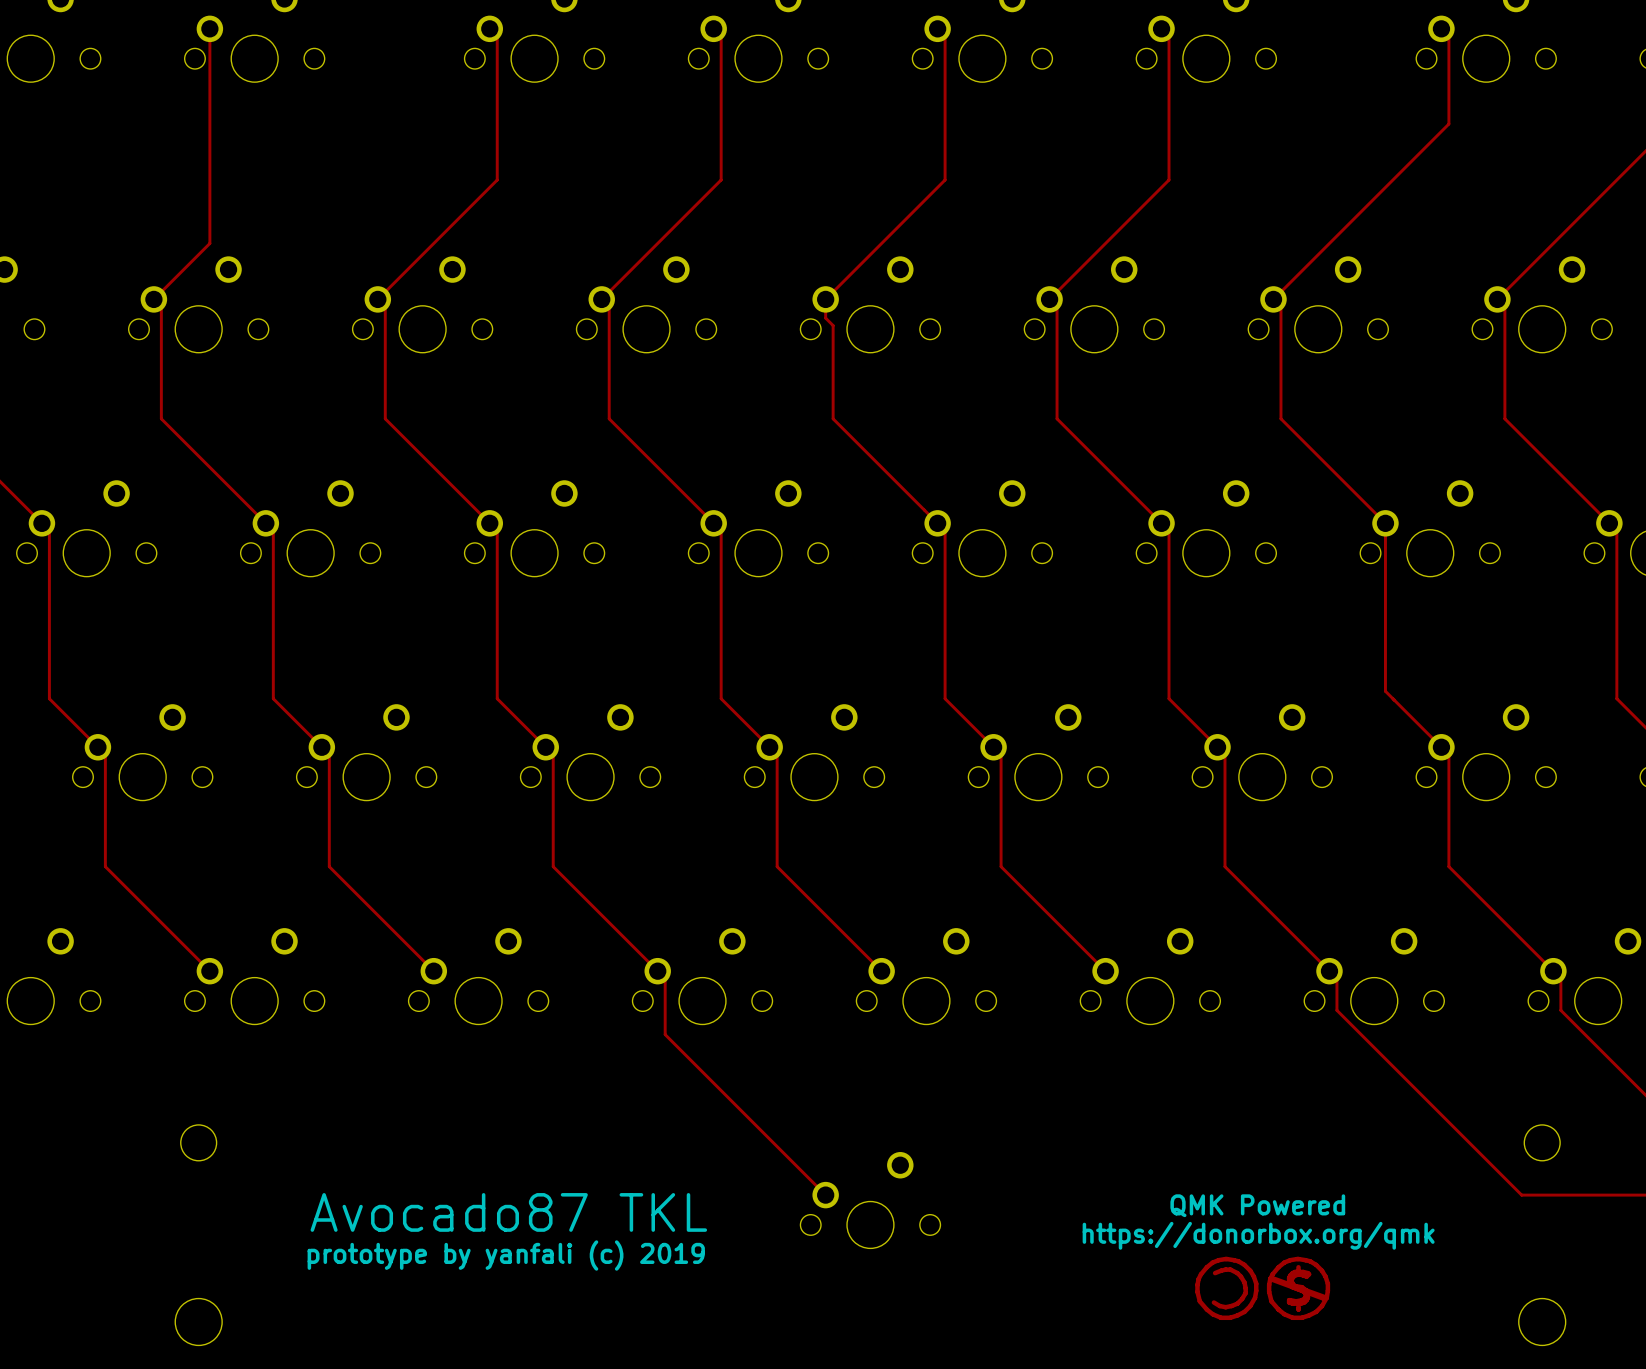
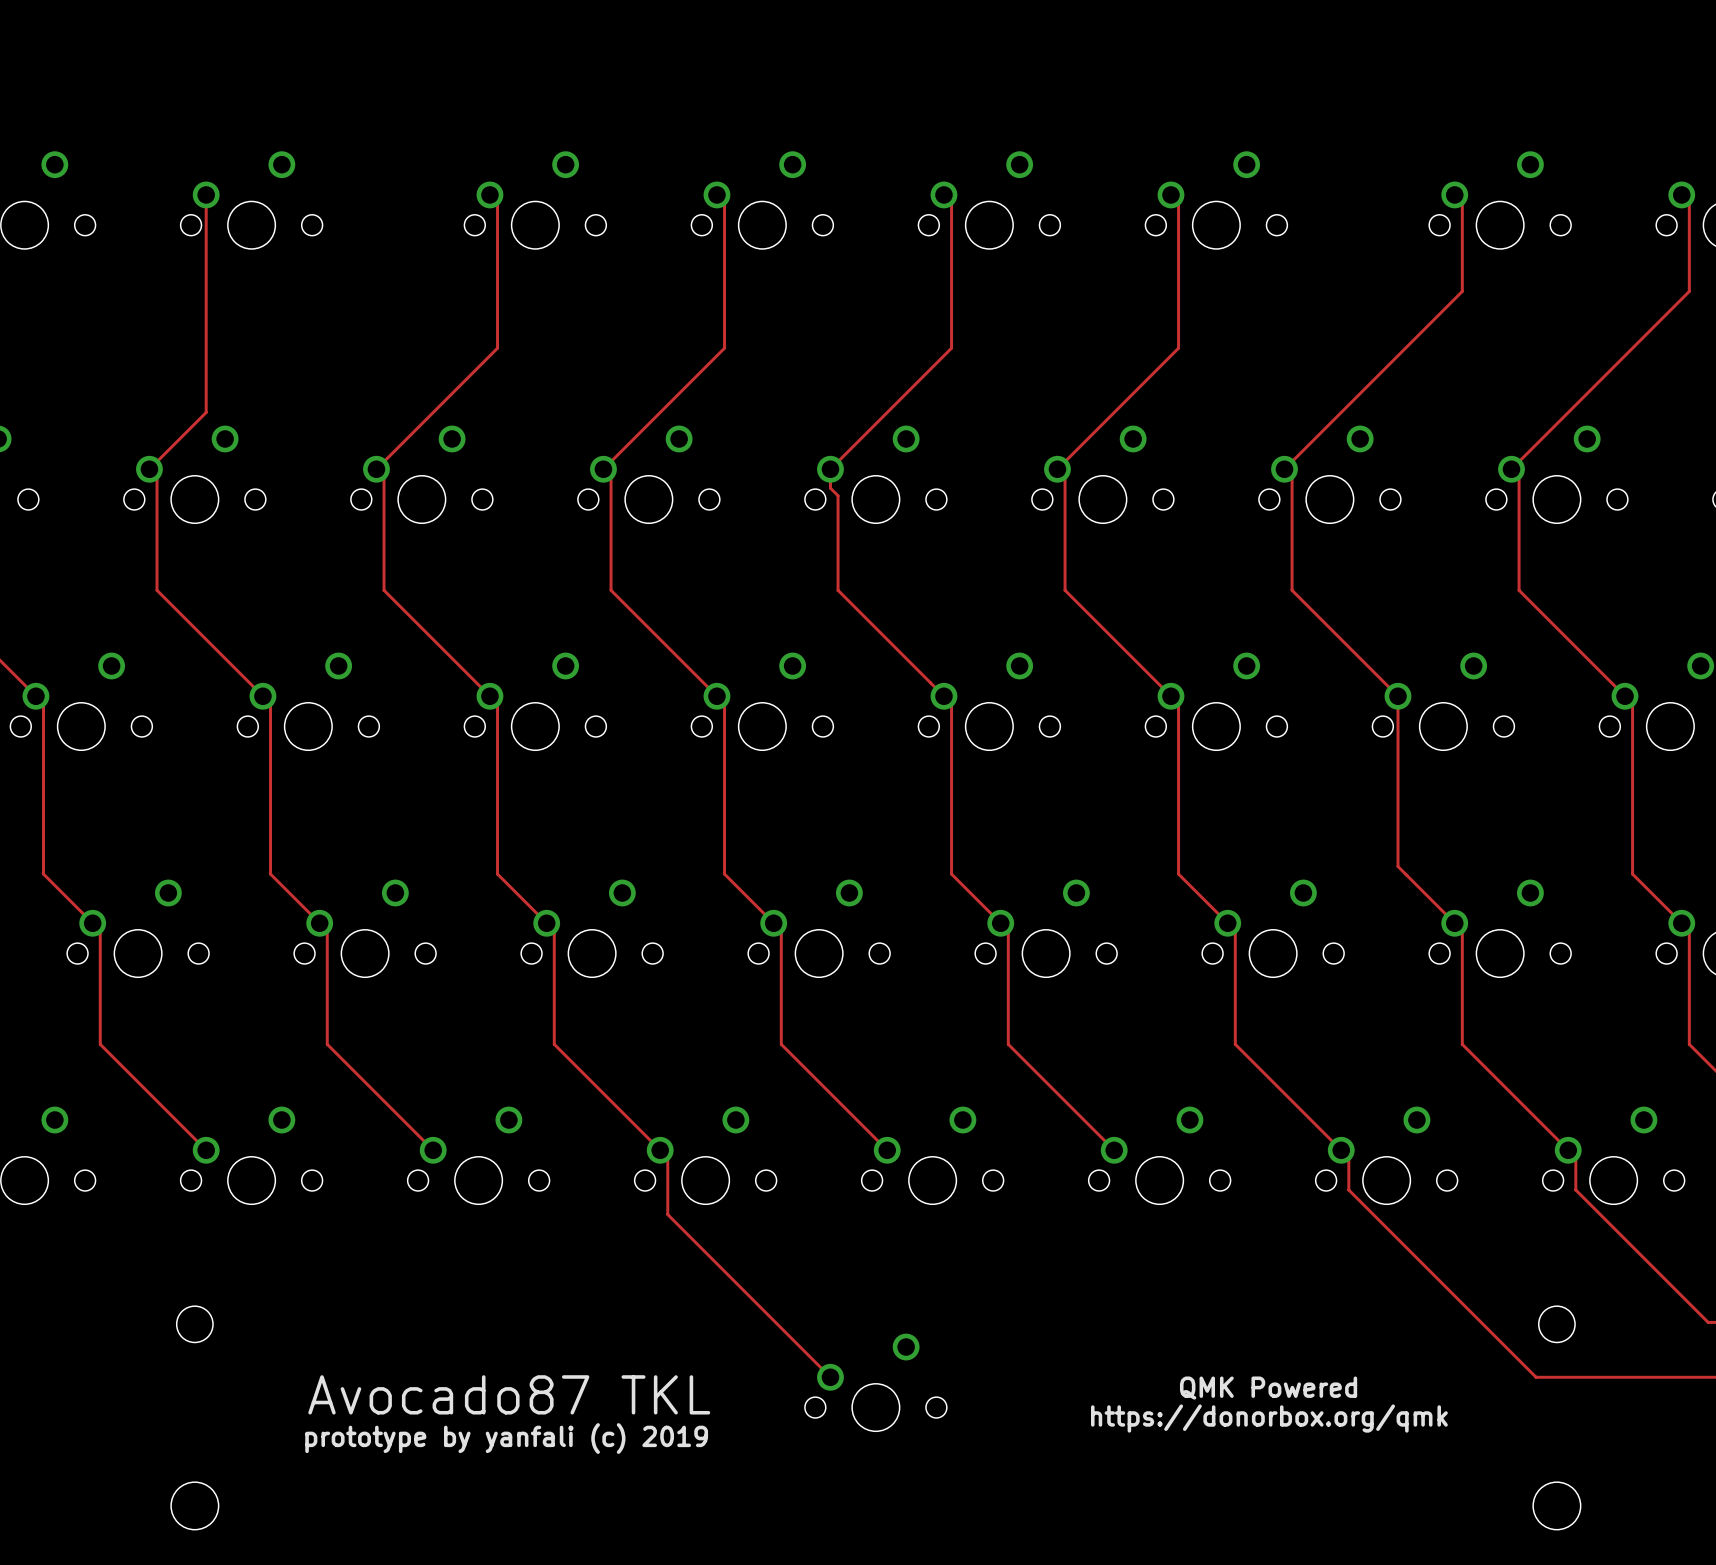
drawing: [1195, 1256, 1331, 1321] -> none

